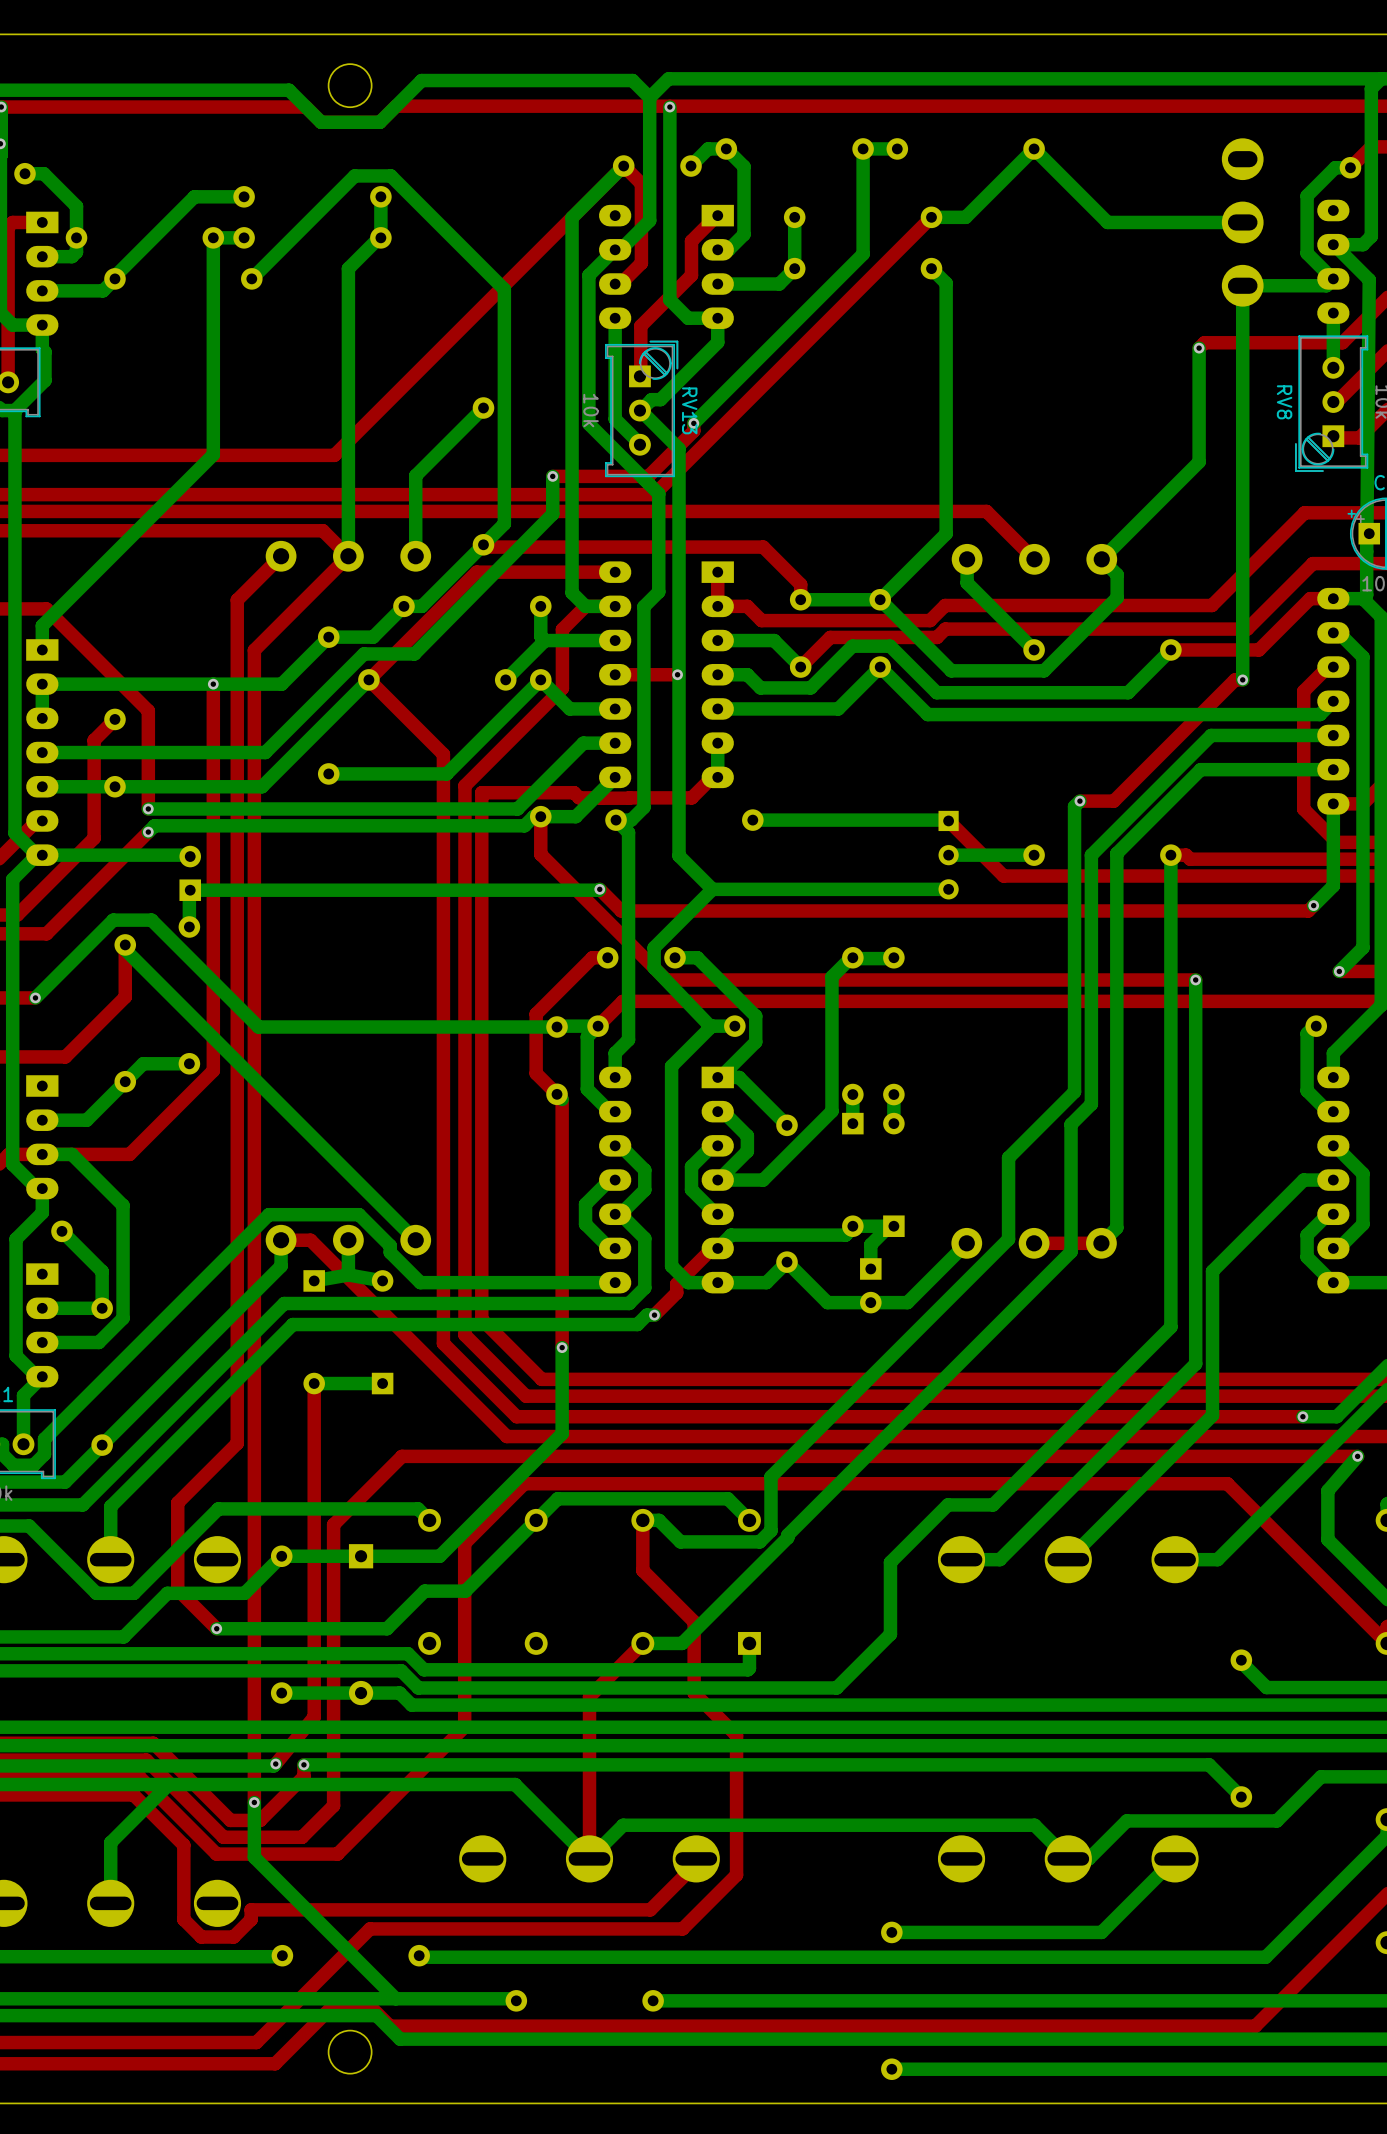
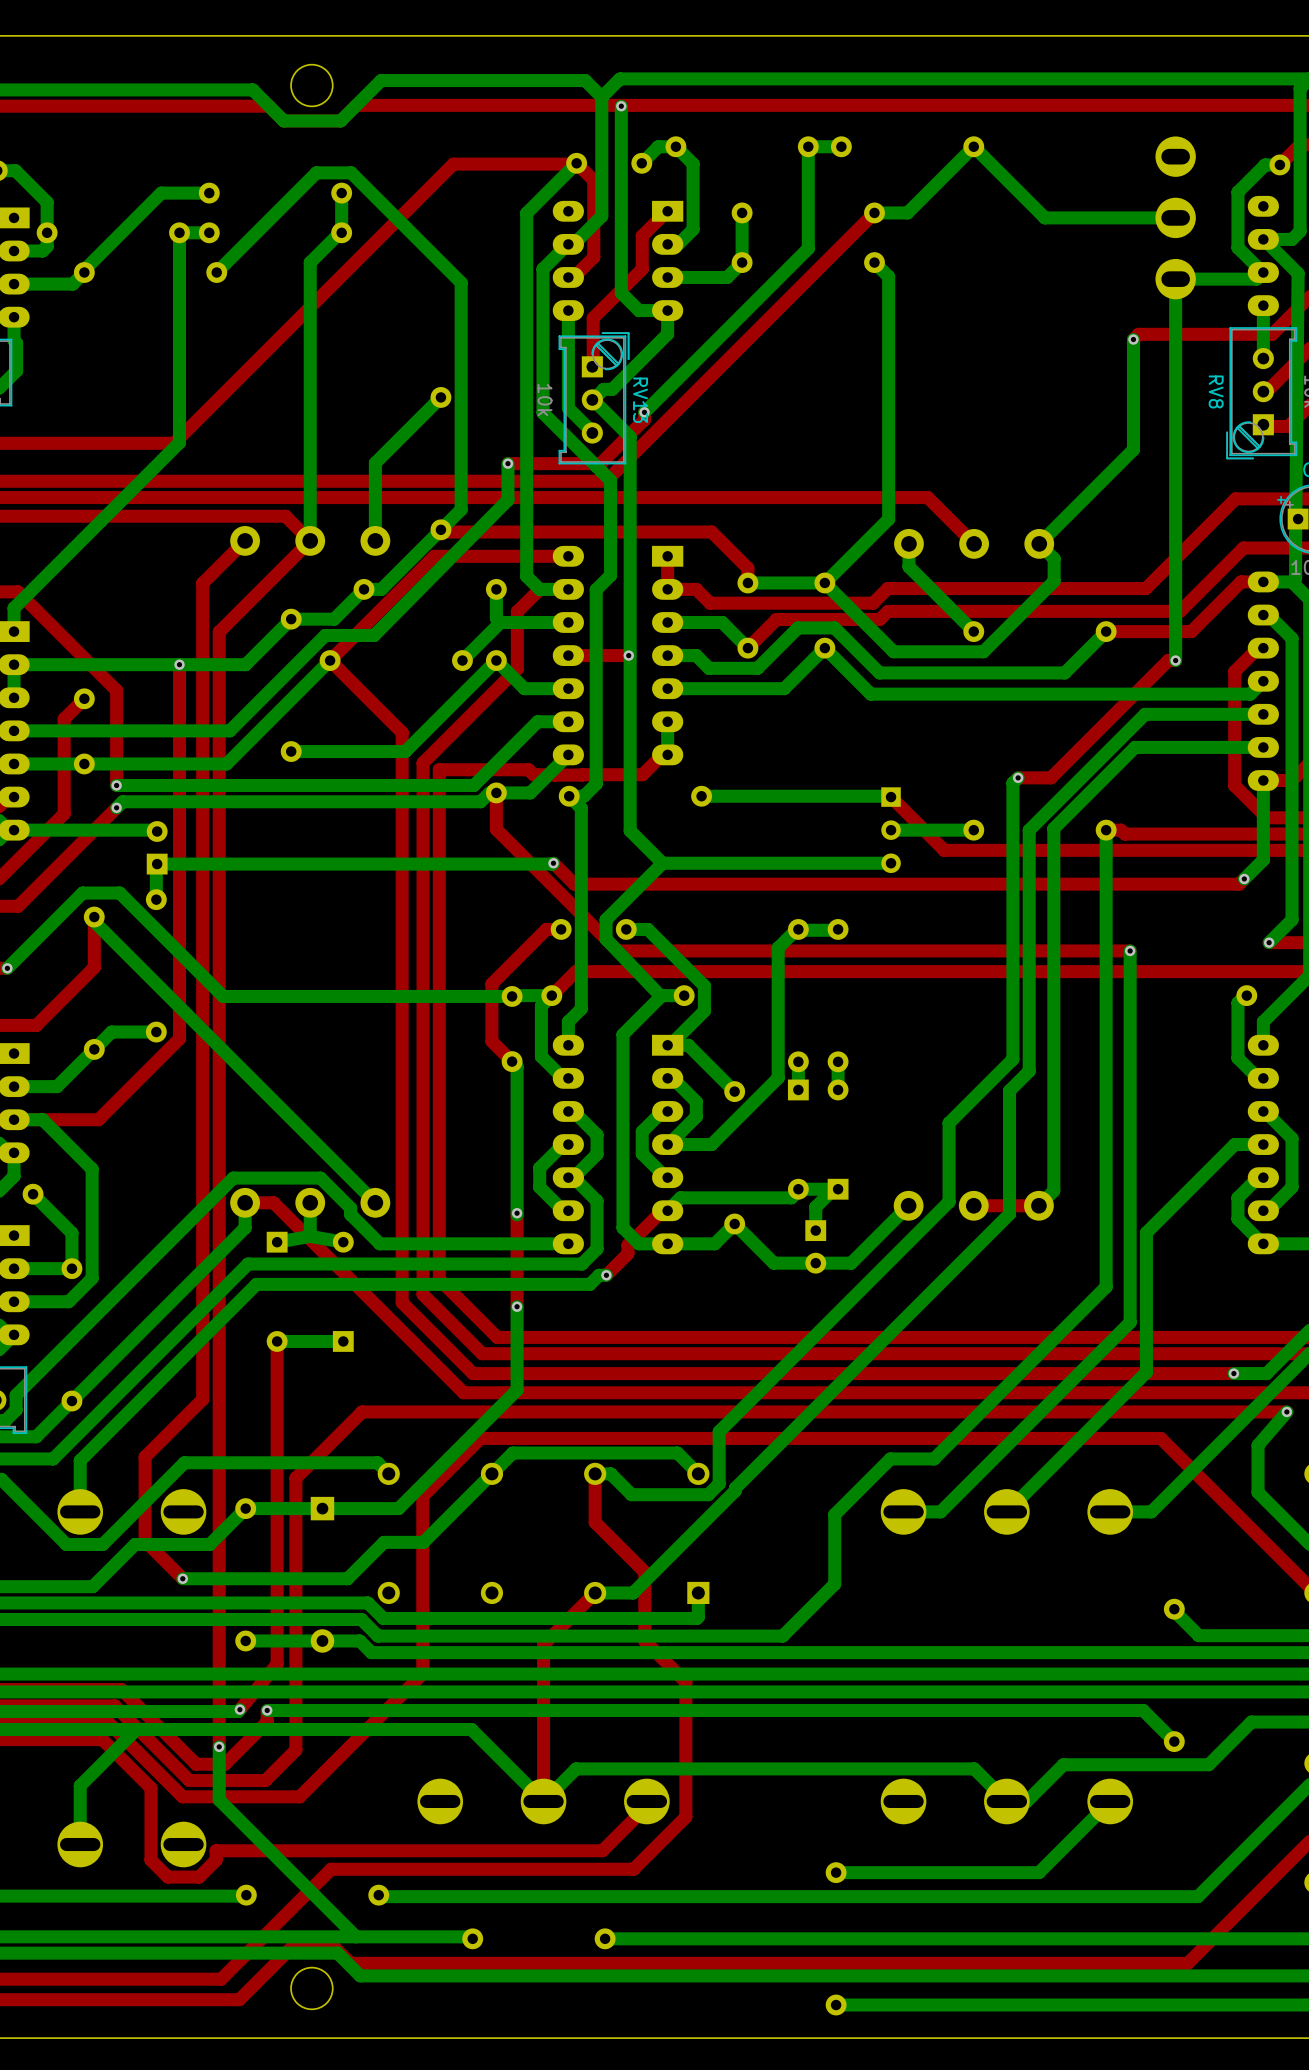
top track: (622, 166) (334, 455) (207, 455) -> (575, 164) (453, 164) (174, 443)
bottom track: none -> (517, 1066) (517, 1214)
top track: (562, 1099) (562, 1251) -> none
via: none -> (517, 1213)

